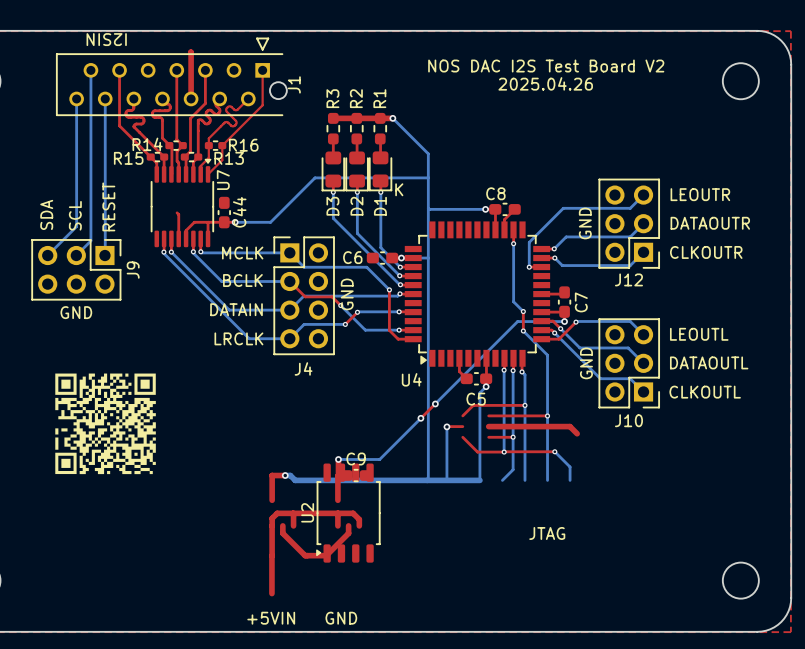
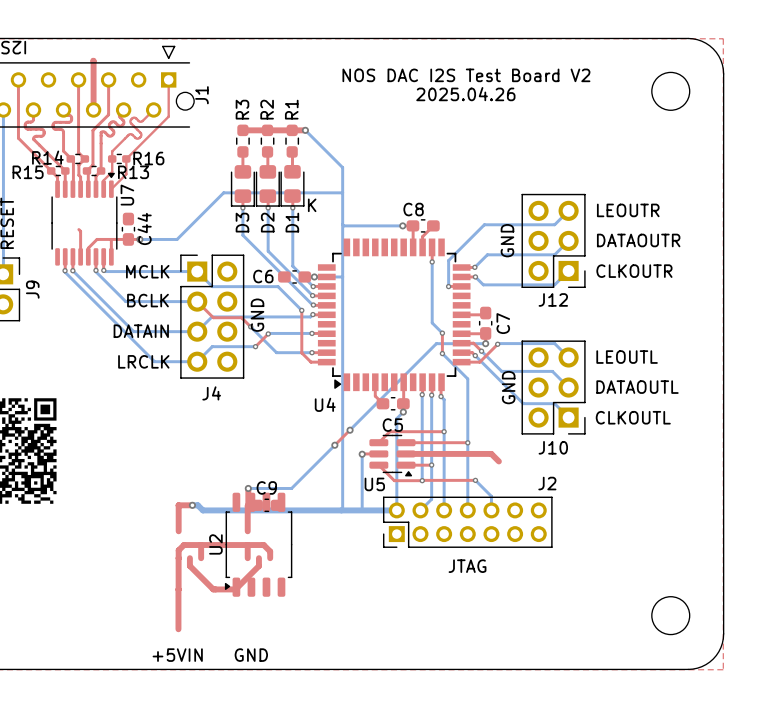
U5: none -> (392, 455)
J2: none -> (467, 522)

